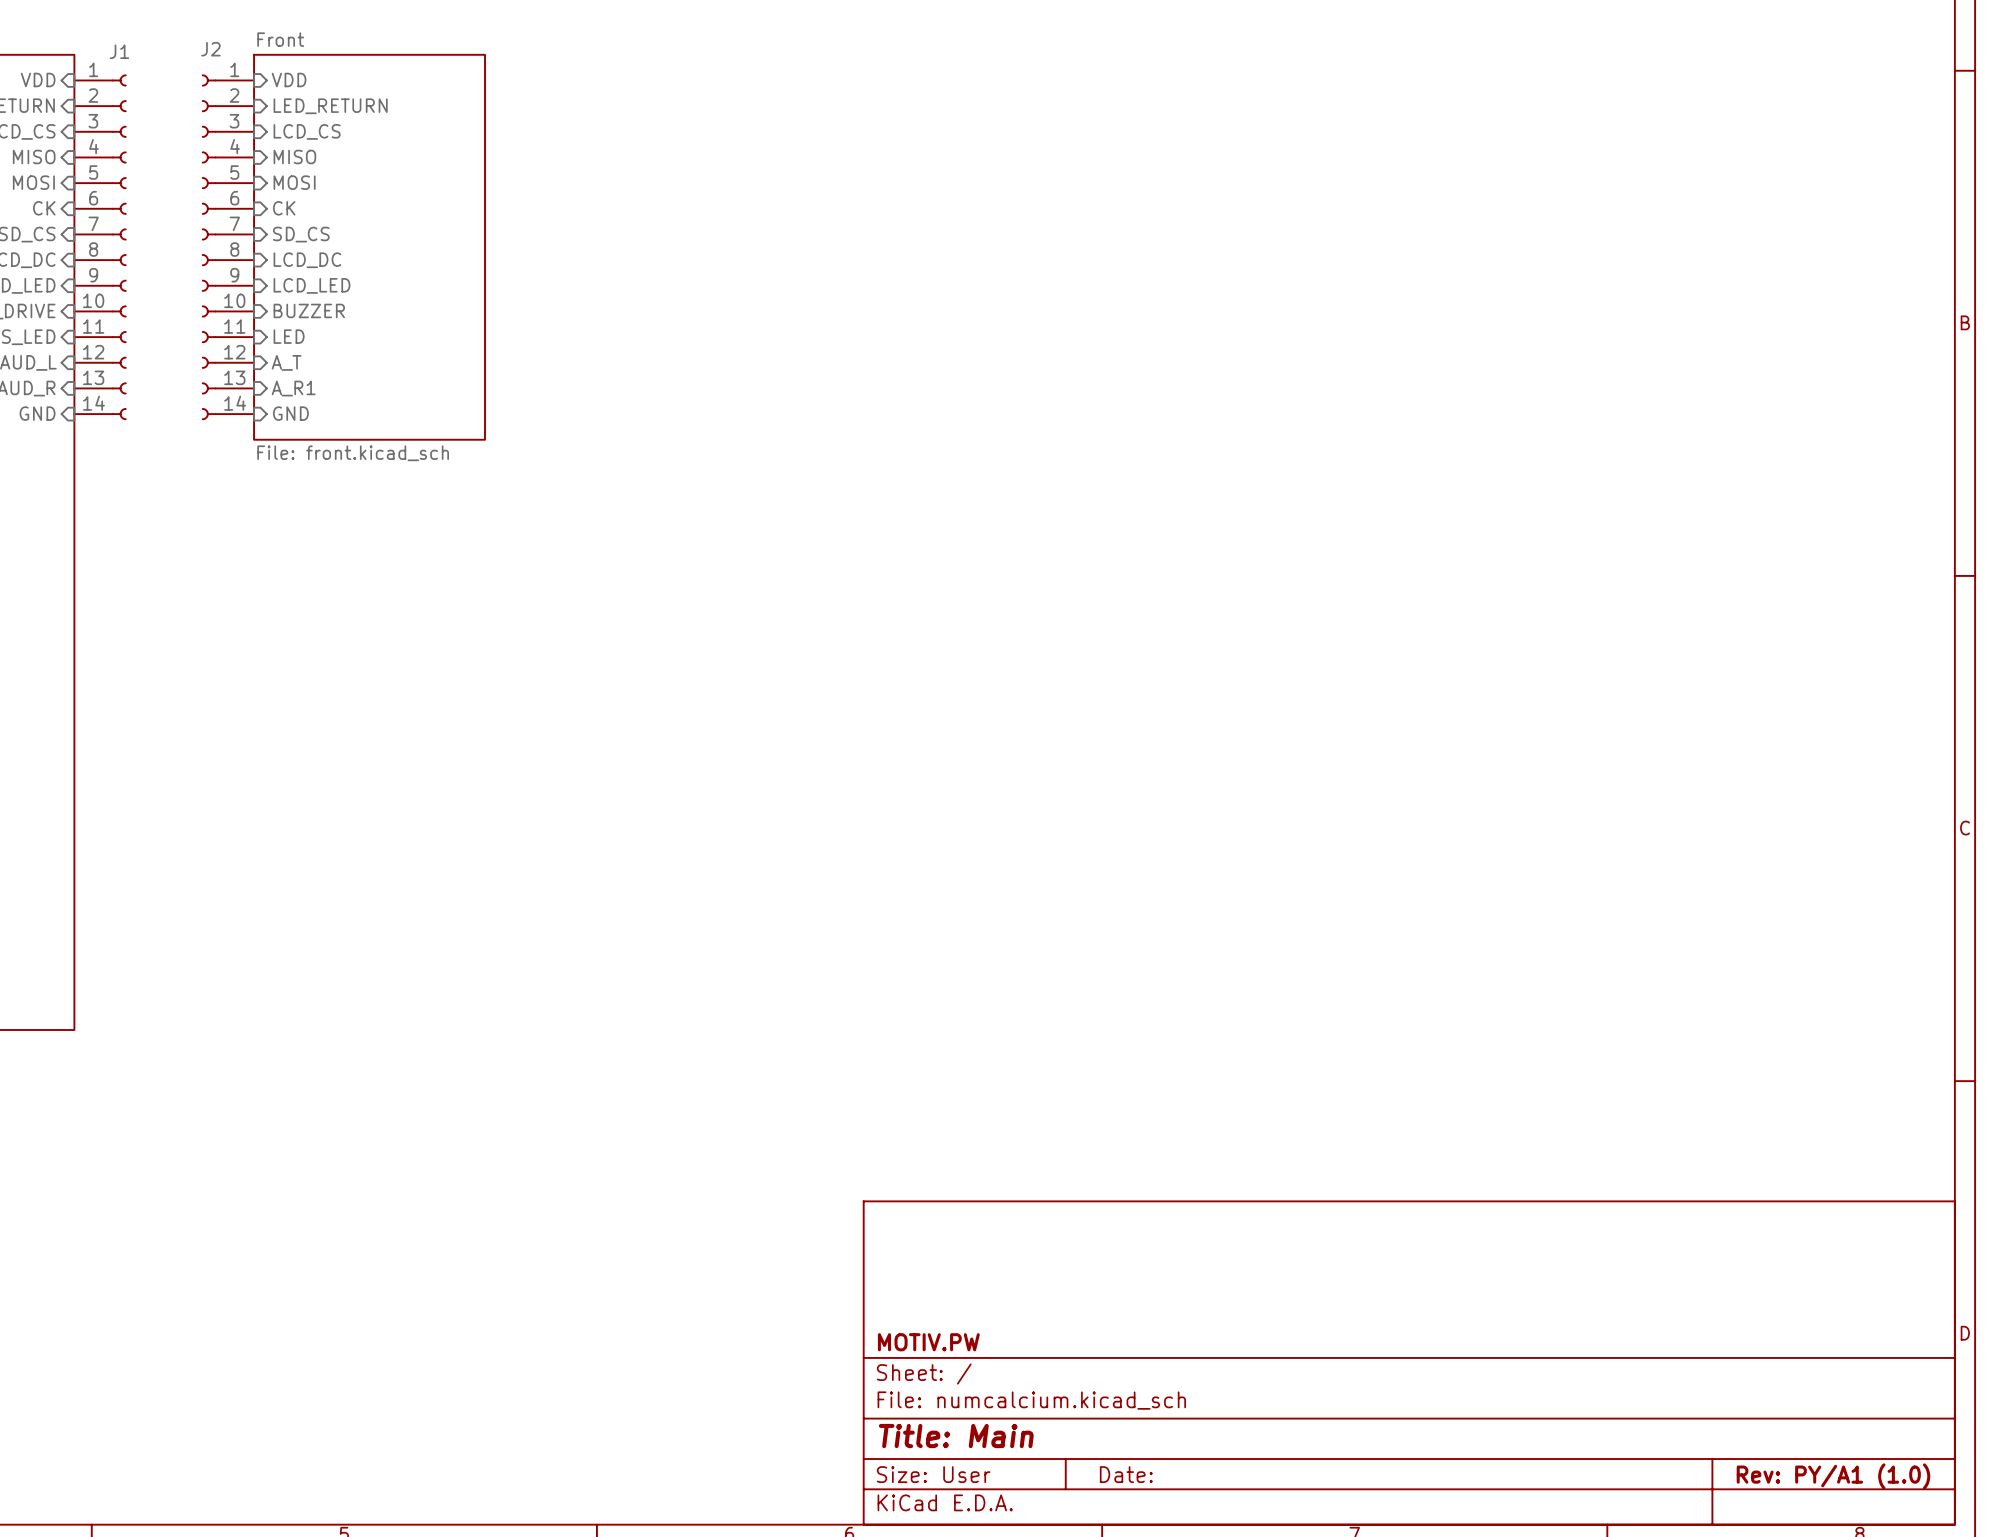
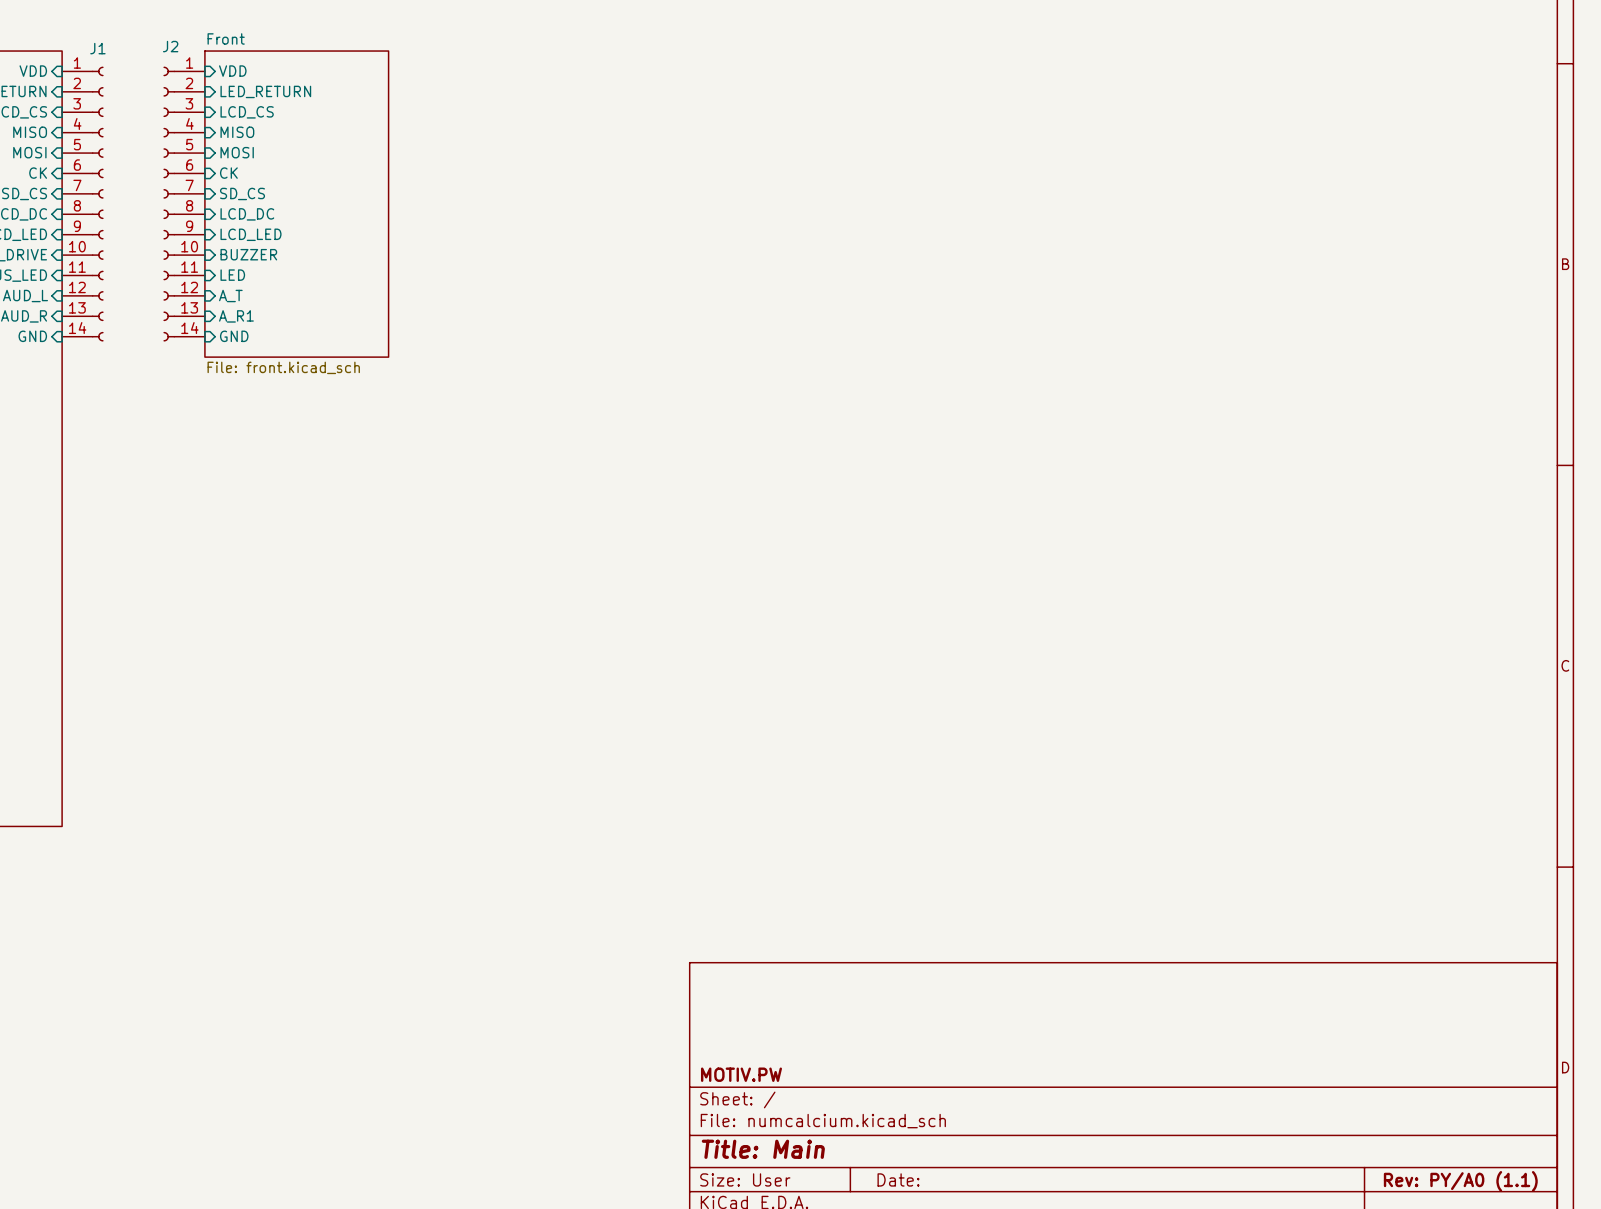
title block: Rev: PY/A1 (1.0) (1833, 1476) -> Rev: PY/A0 (1.1) (1460, 1181)

